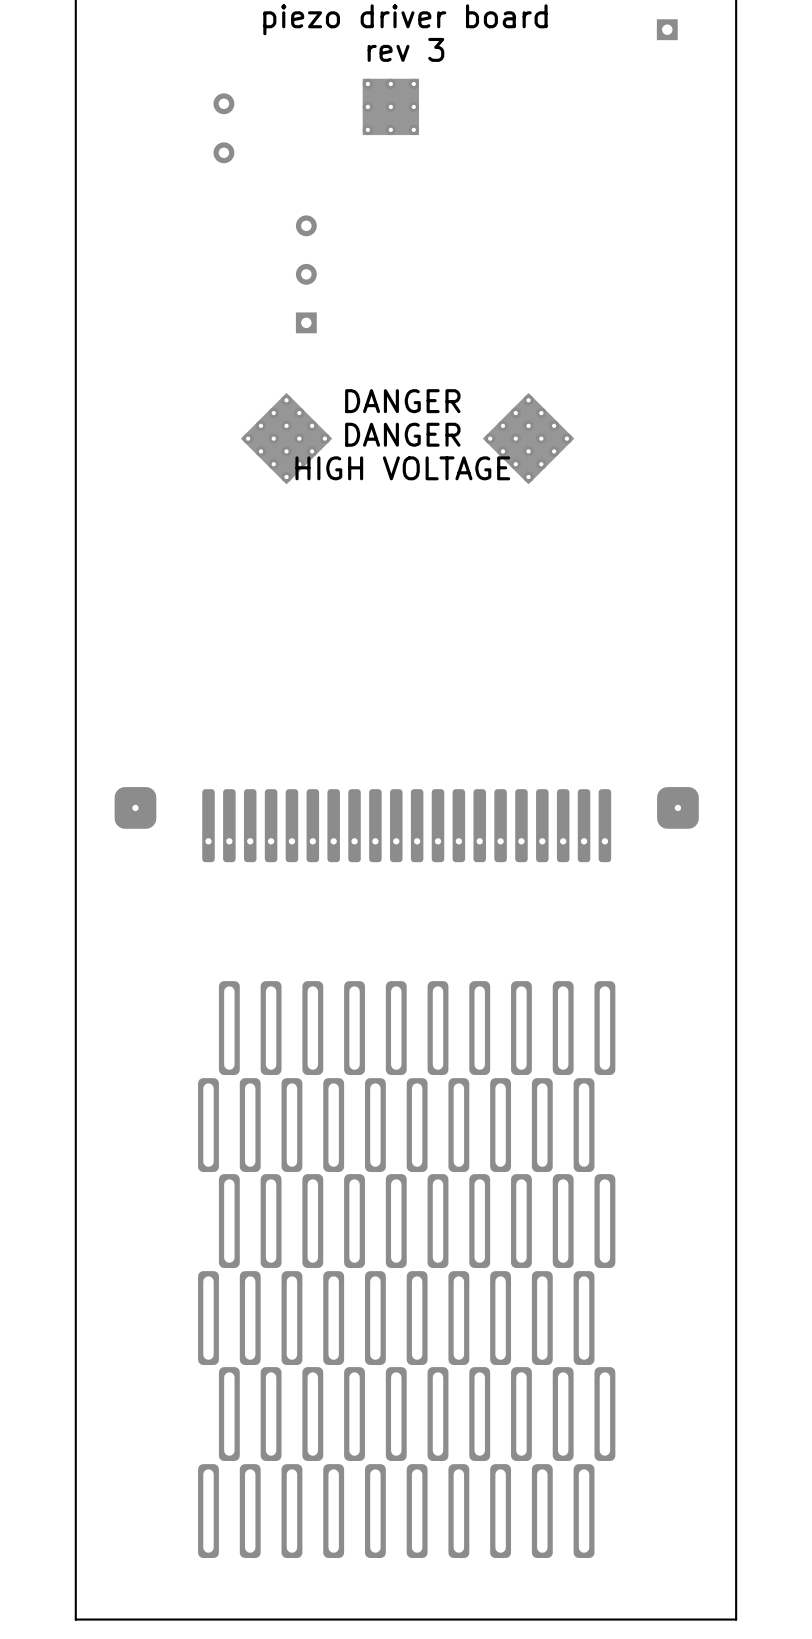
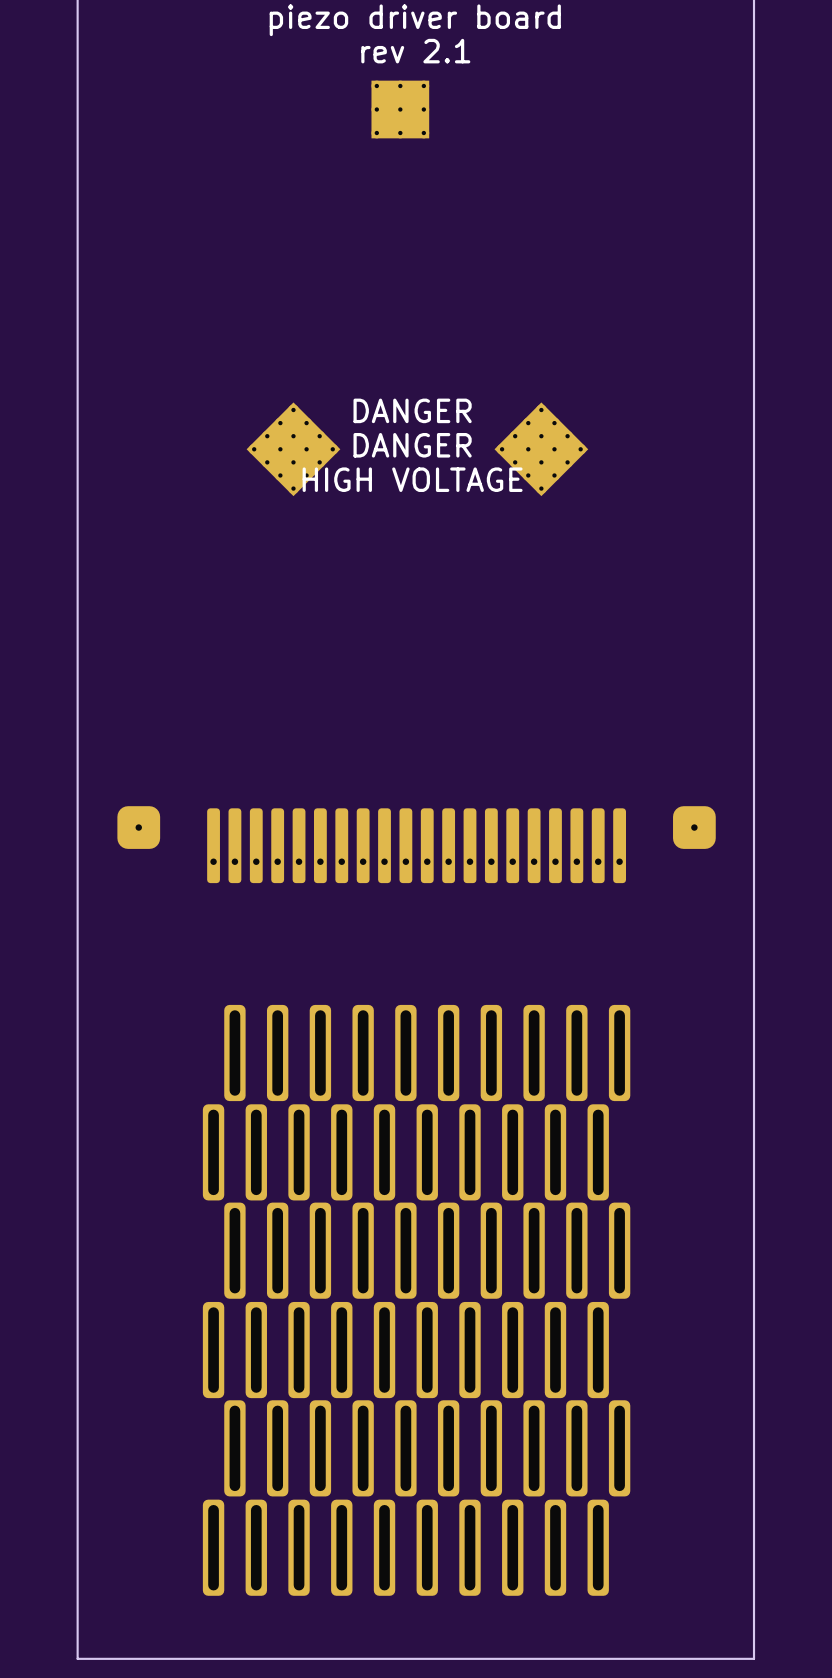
part: (667, 29) -> none
text: rev 3 (405, 49) -> rev 2.1 (415, 51)
part: (223, 103) -> none
part: (223, 152) -> none
part: (306, 225) -> none
part: (306, 274) -> none
part: (306, 322) -> none

